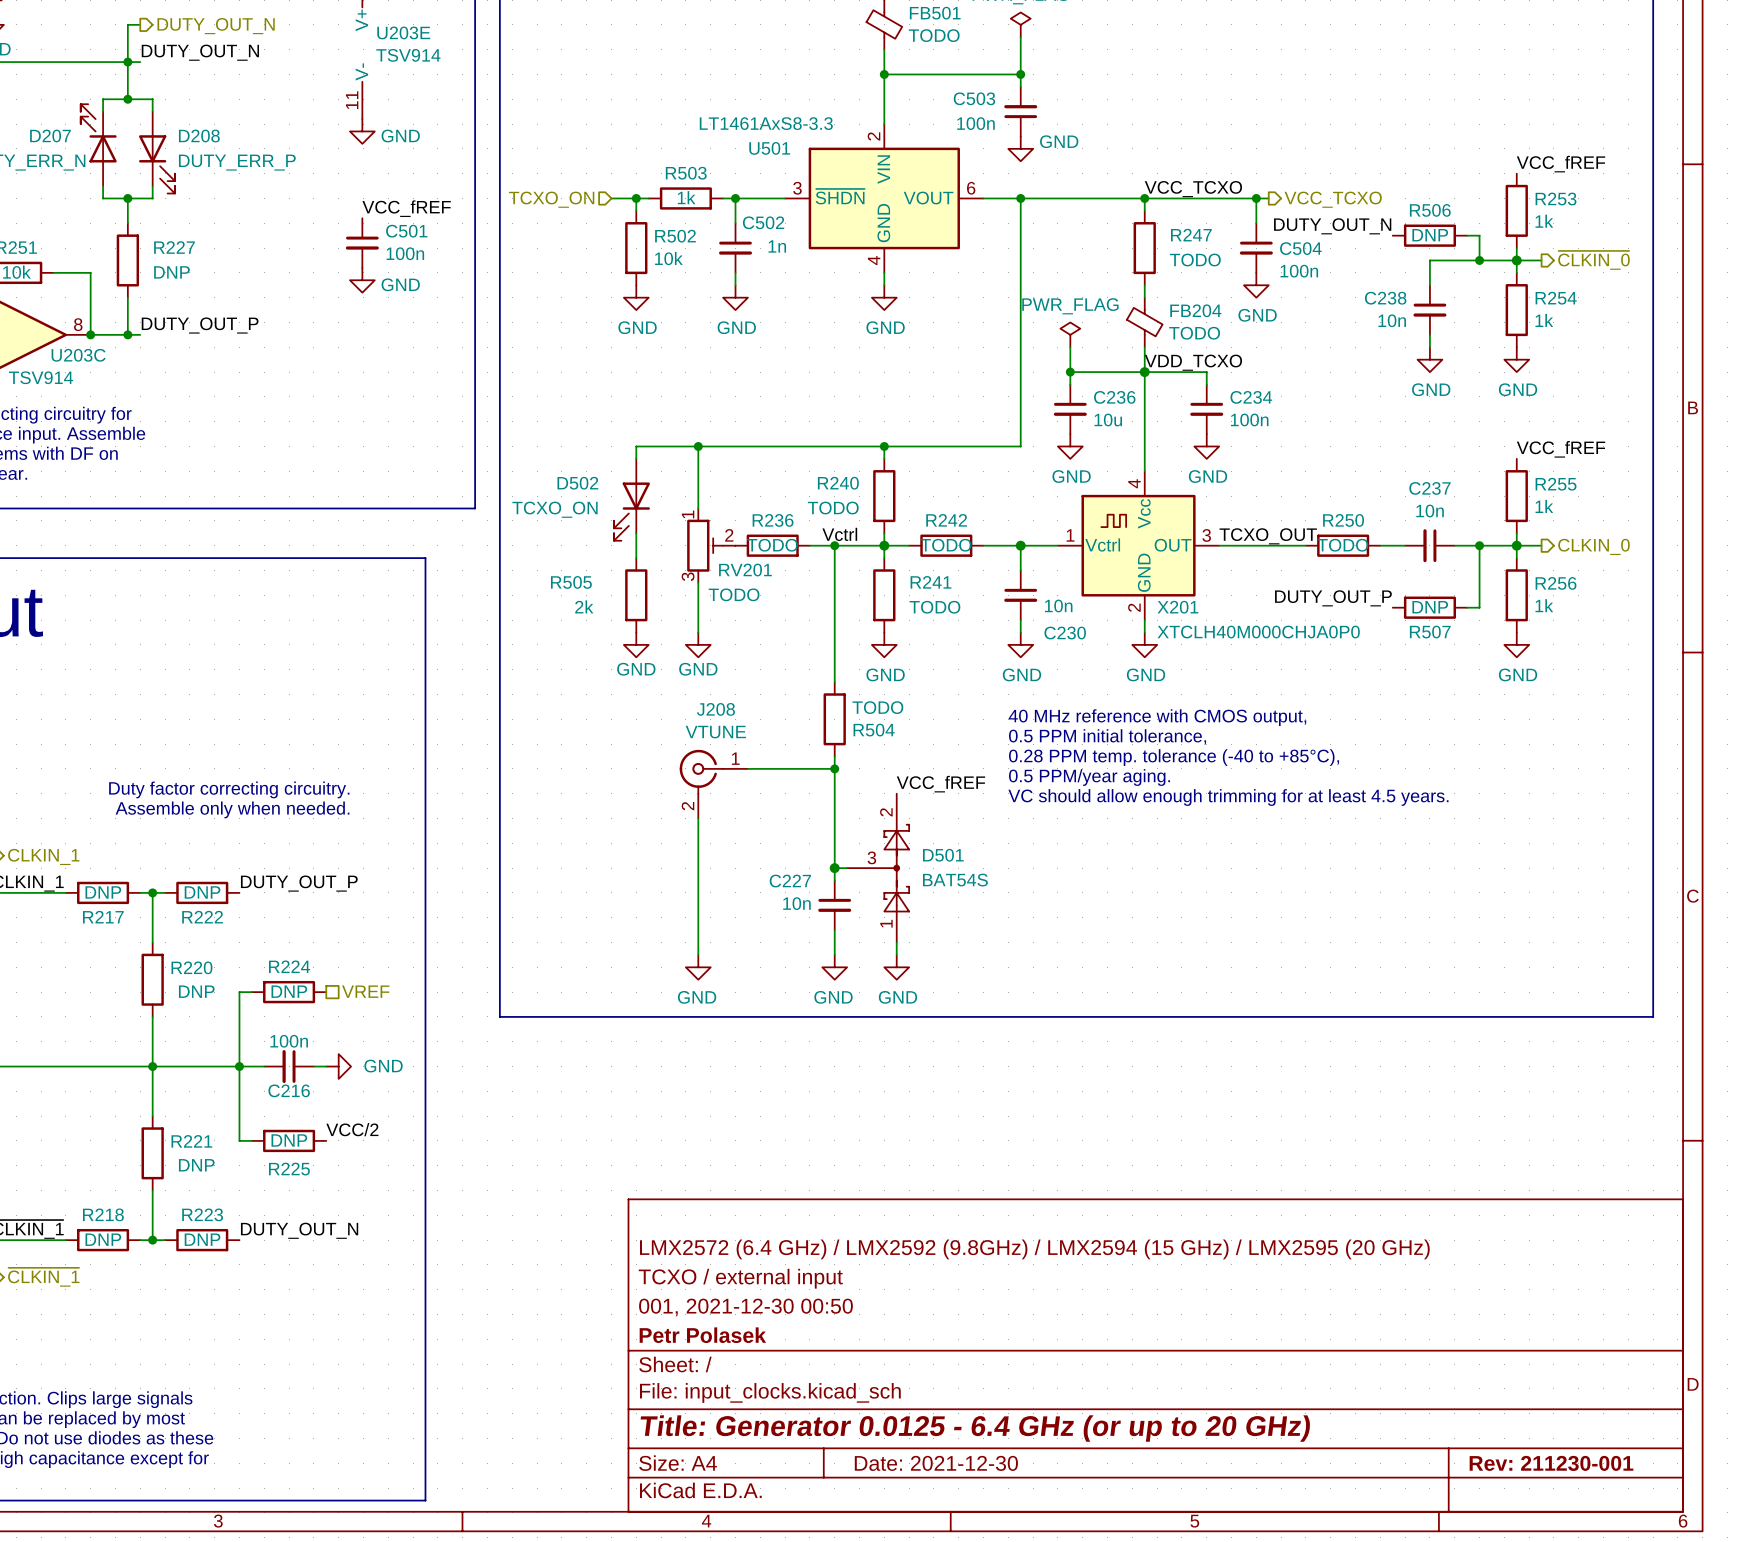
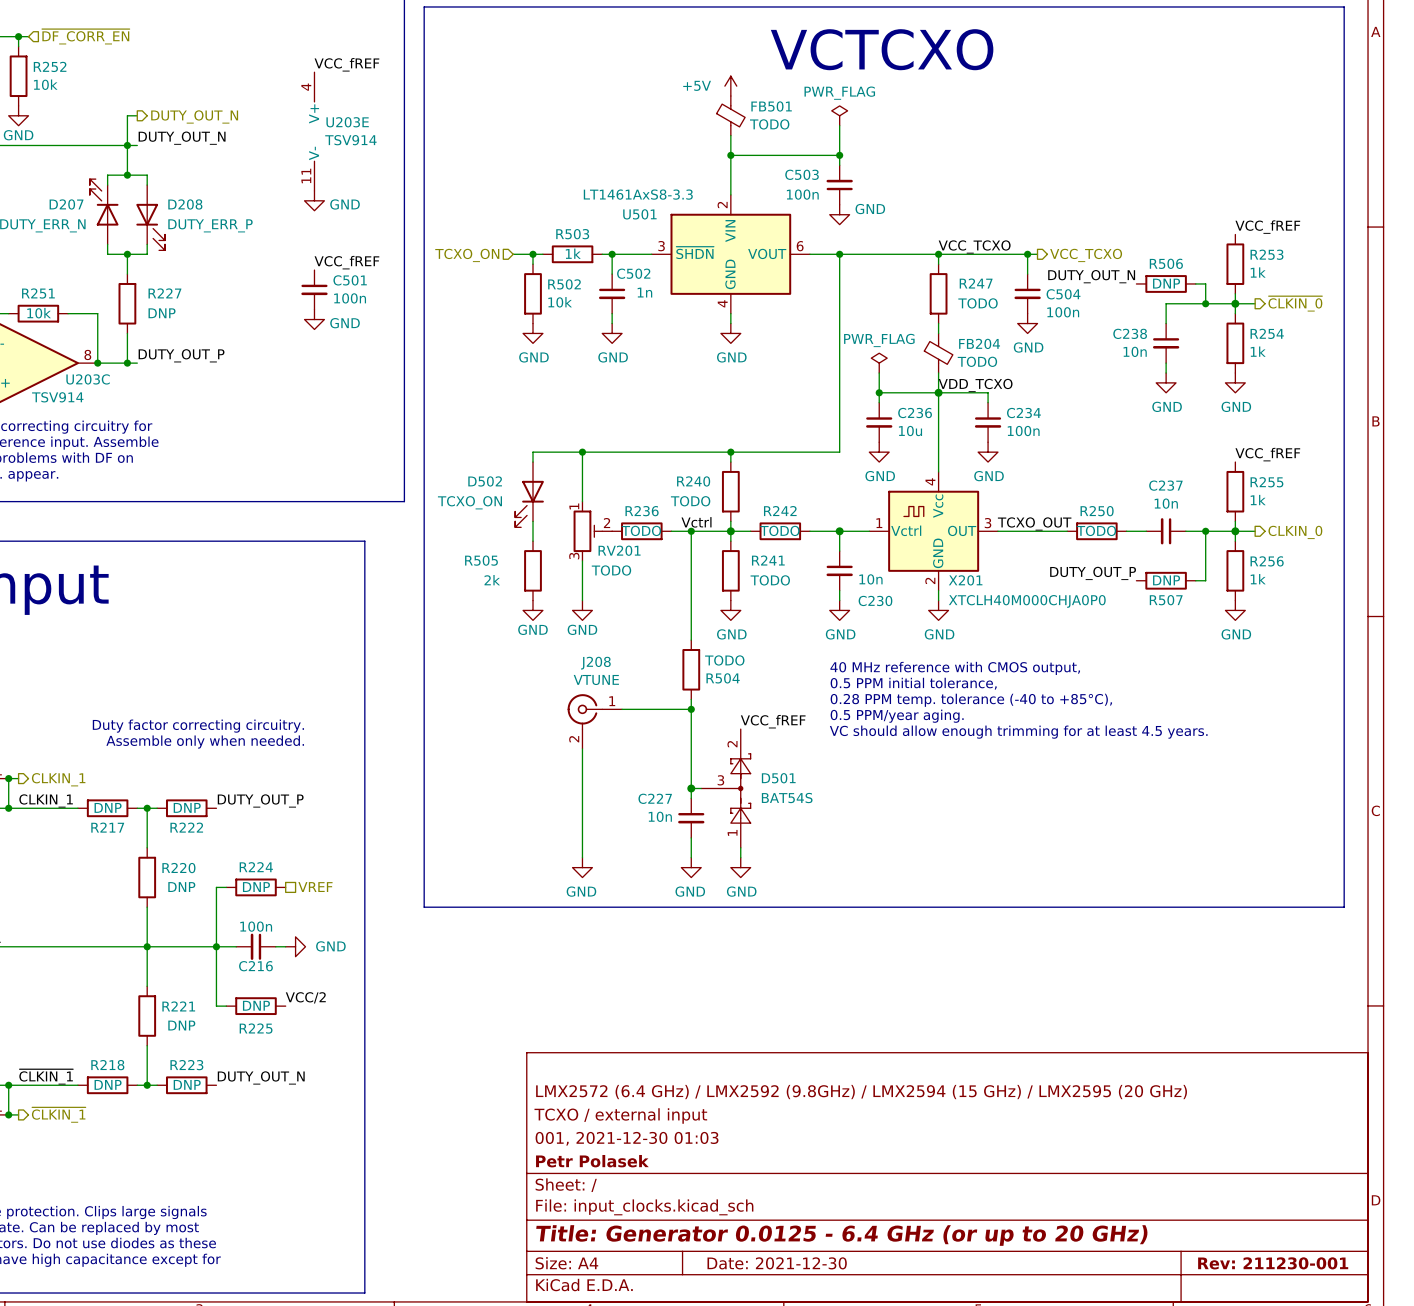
title block: 001, 2021-12-30 00:50 (745, 1307) -> 001, 2021-12-30 01:03 (627, 1138)

